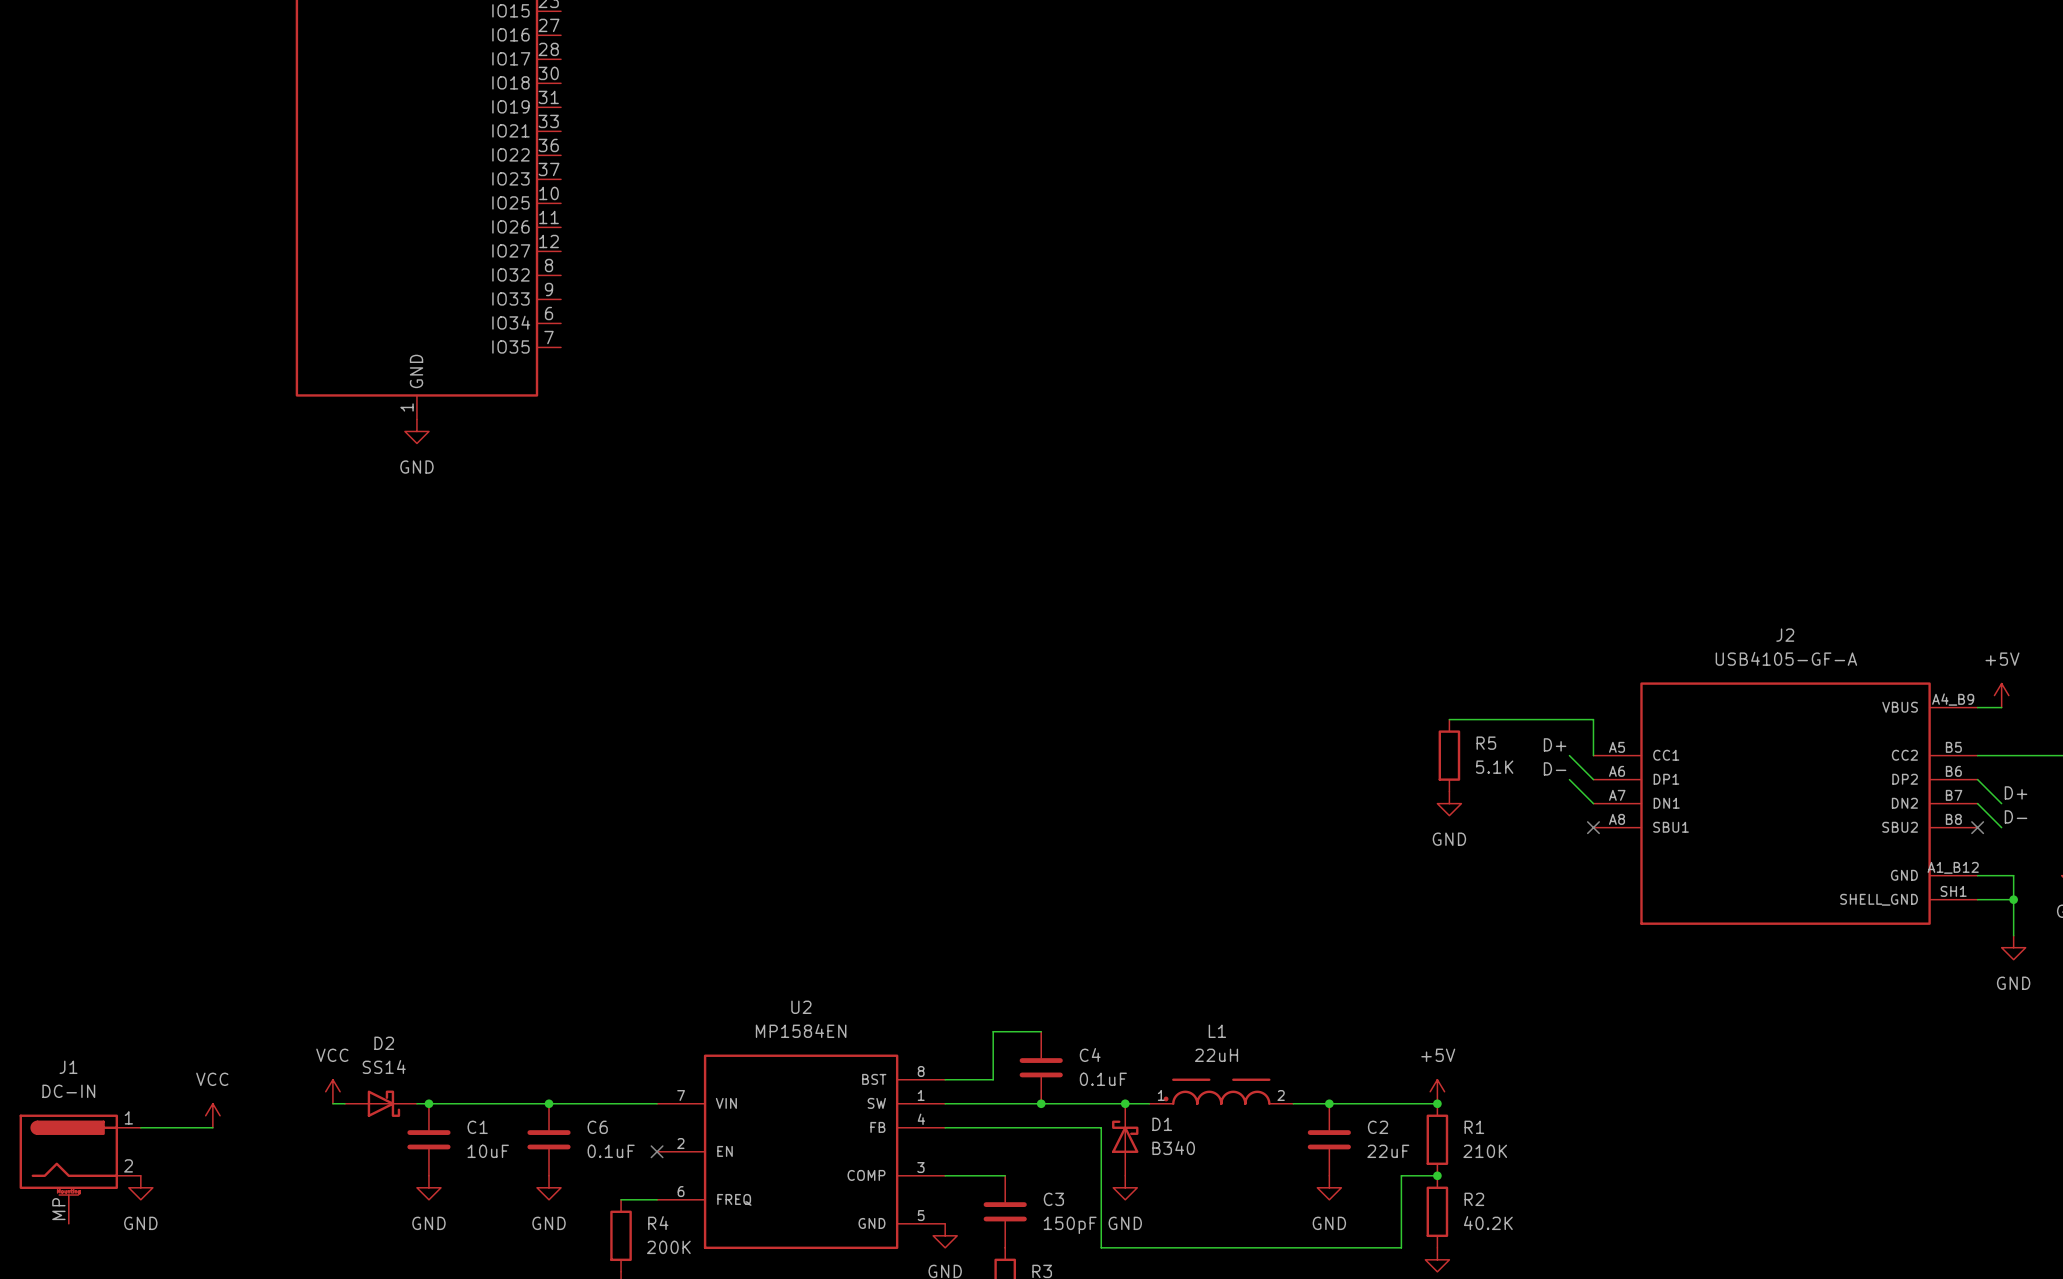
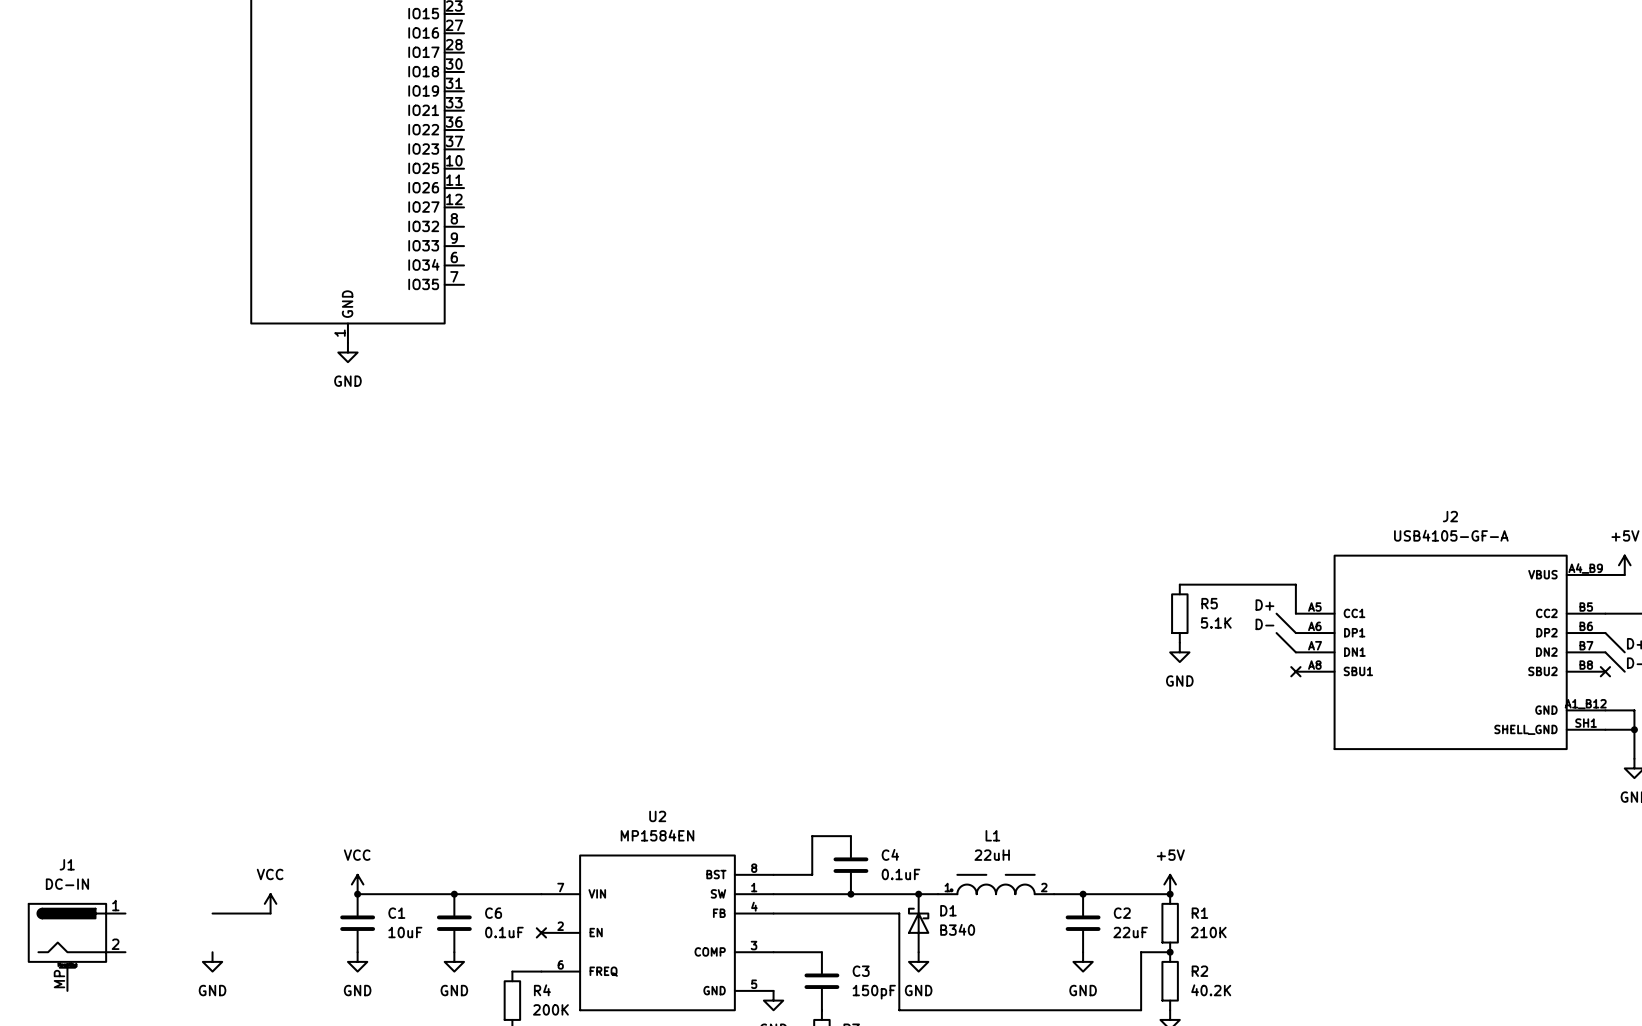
power symbol position: VCC (332, 1091) -> VCC (270, 903)
power symbol: none -> VCC (357, 884)
wire: (332, 1103) (344, 1103) -> none
D2: SS14 (380, 1103) -> none
wire: (416, 1103) (428, 1103) -> none
power symbol: VCC (212, 1115) -> none
wire: (140, 1127) (212, 1127) -> (212, 913) (270, 913)
power symbol position: GND (140, 1187) -> GND (212, 961)

